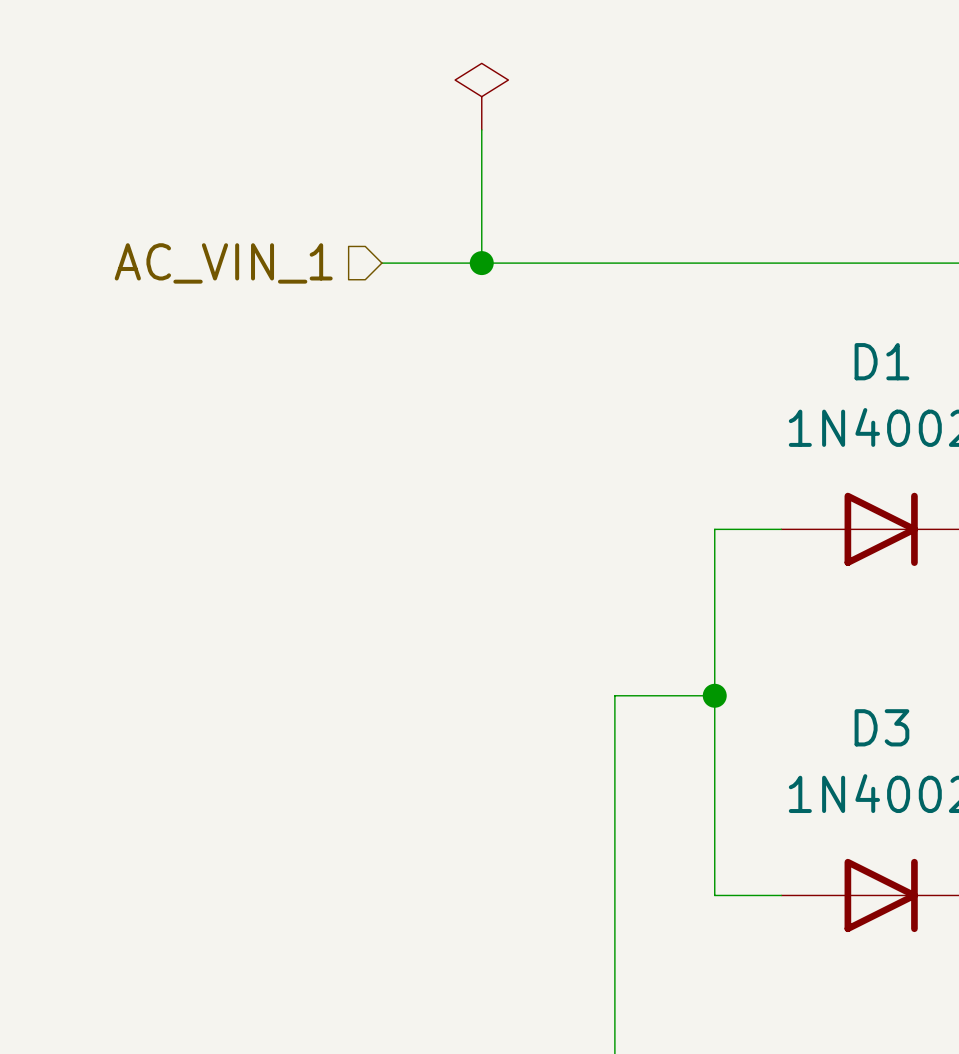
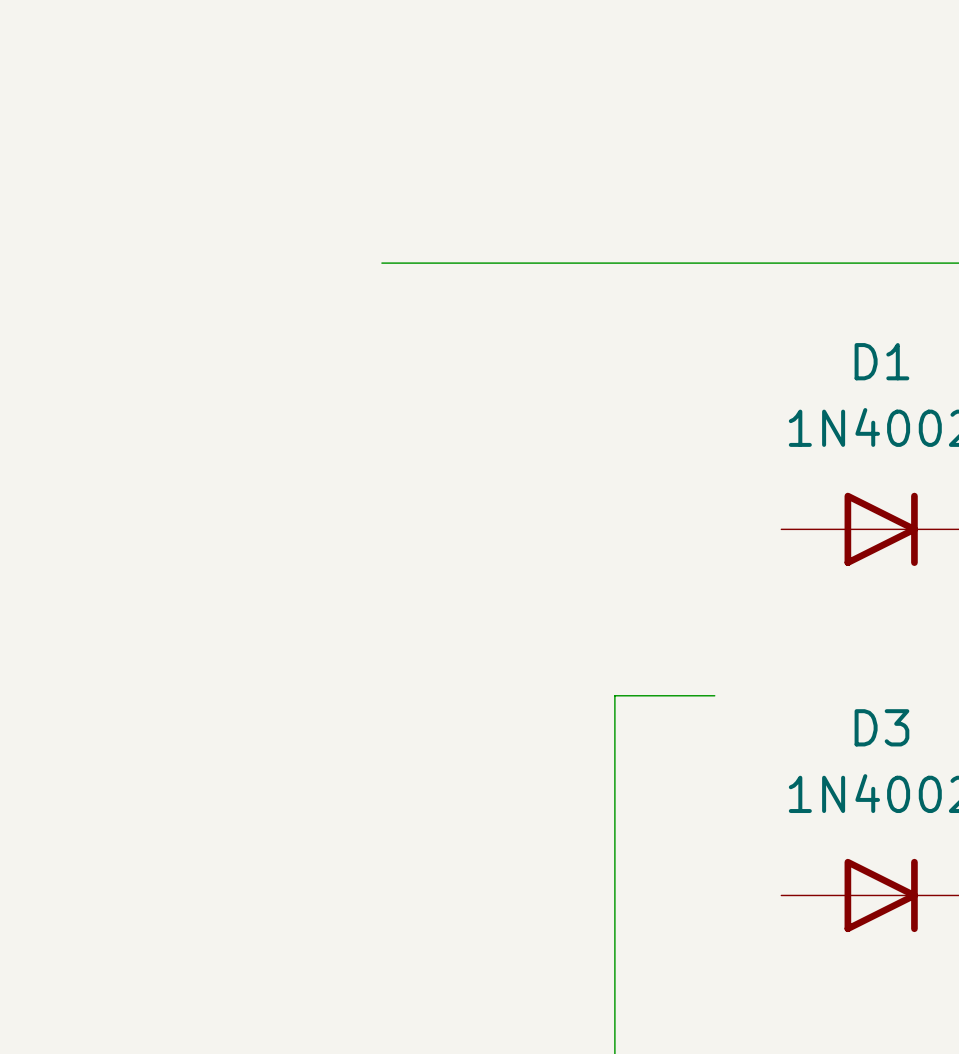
power symbol: (481, 96) -> none
wire: (481, 129) (481, 263) -> none
hierarchical label: AC_VIN_1 (223, 263) -> none
junction: (481, 263) -> none
wire: (781, 529) (714, 529) (714, 895) (781, 895) -> none
junction: (714, 695) -> none

